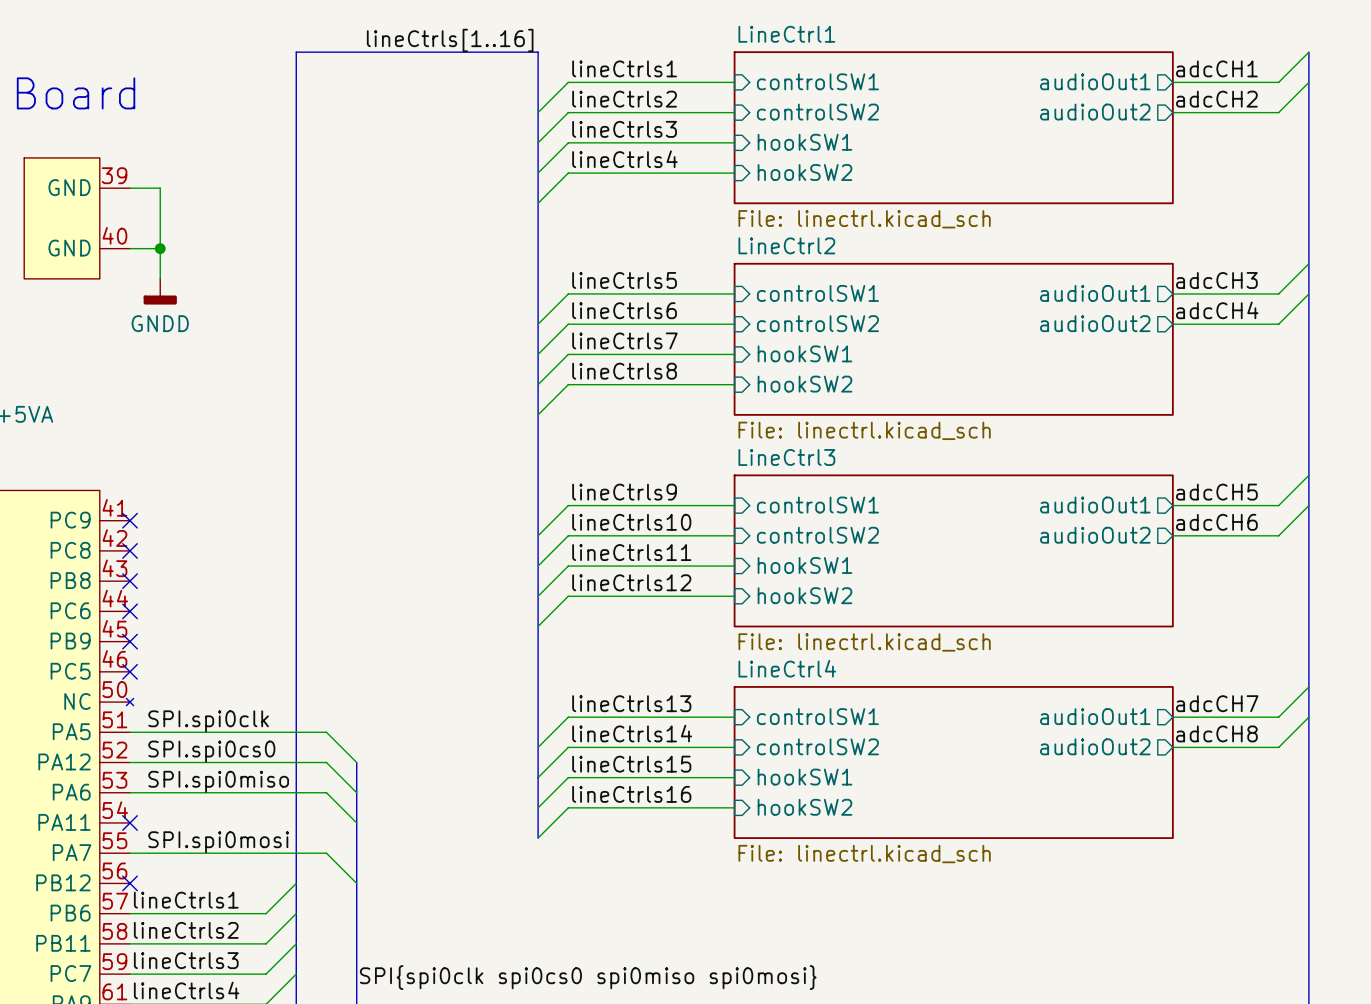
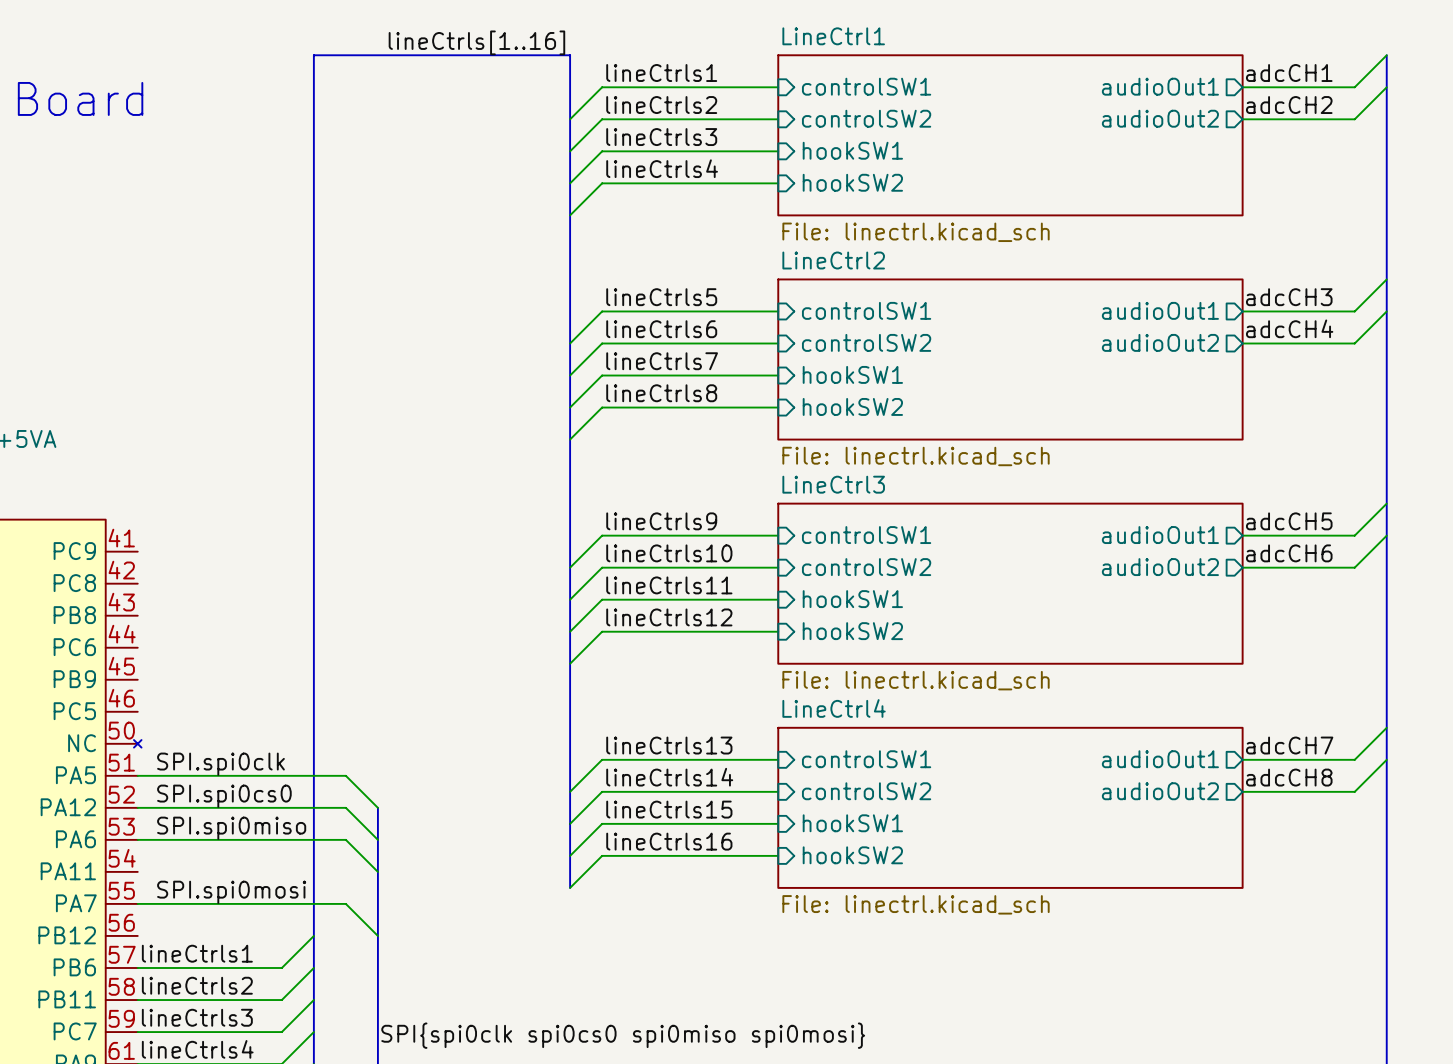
wire: (130, 188) (160, 188) (160, 278) -> none
part: (77, 218) -> none
wire: (130, 248) (160, 248) -> none
junction: (160, 248) -> none
power symbol: GNDD (160, 291) -> none
no-connect mark: (130, 520) -> none
no-connect mark: (130, 550) -> none
no-connect mark: (130, 581) -> none
no-connect mark: (130, 611) -> none
no-connect mark: (130, 641) -> none
no-connect mark: (130, 671) -> none
no-connect mark: (130, 822) -> none
no-connect mark: (130, 883) -> none

